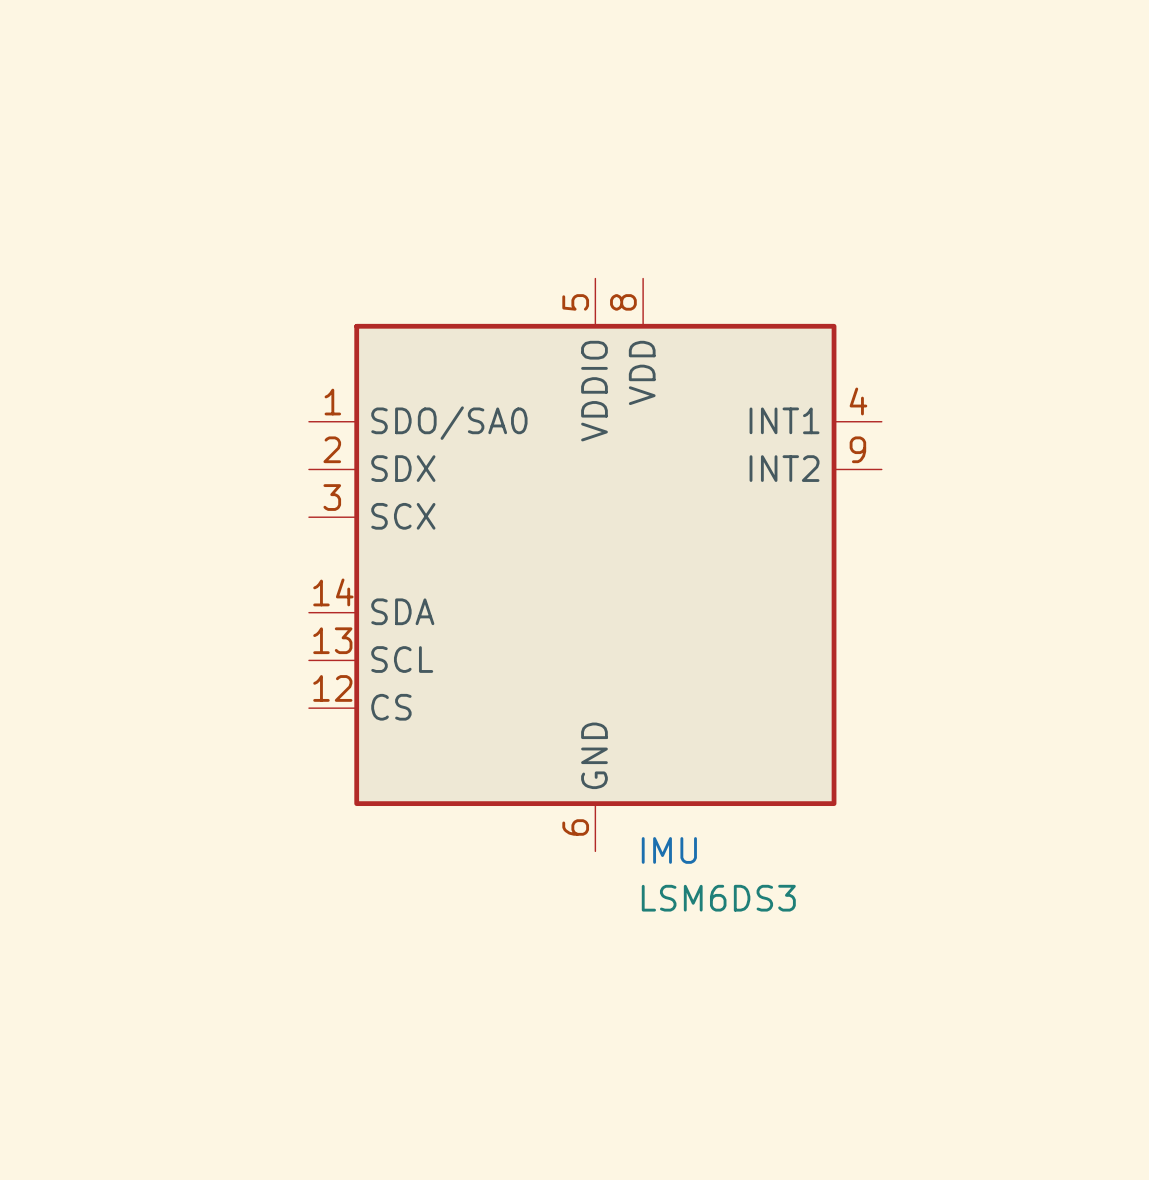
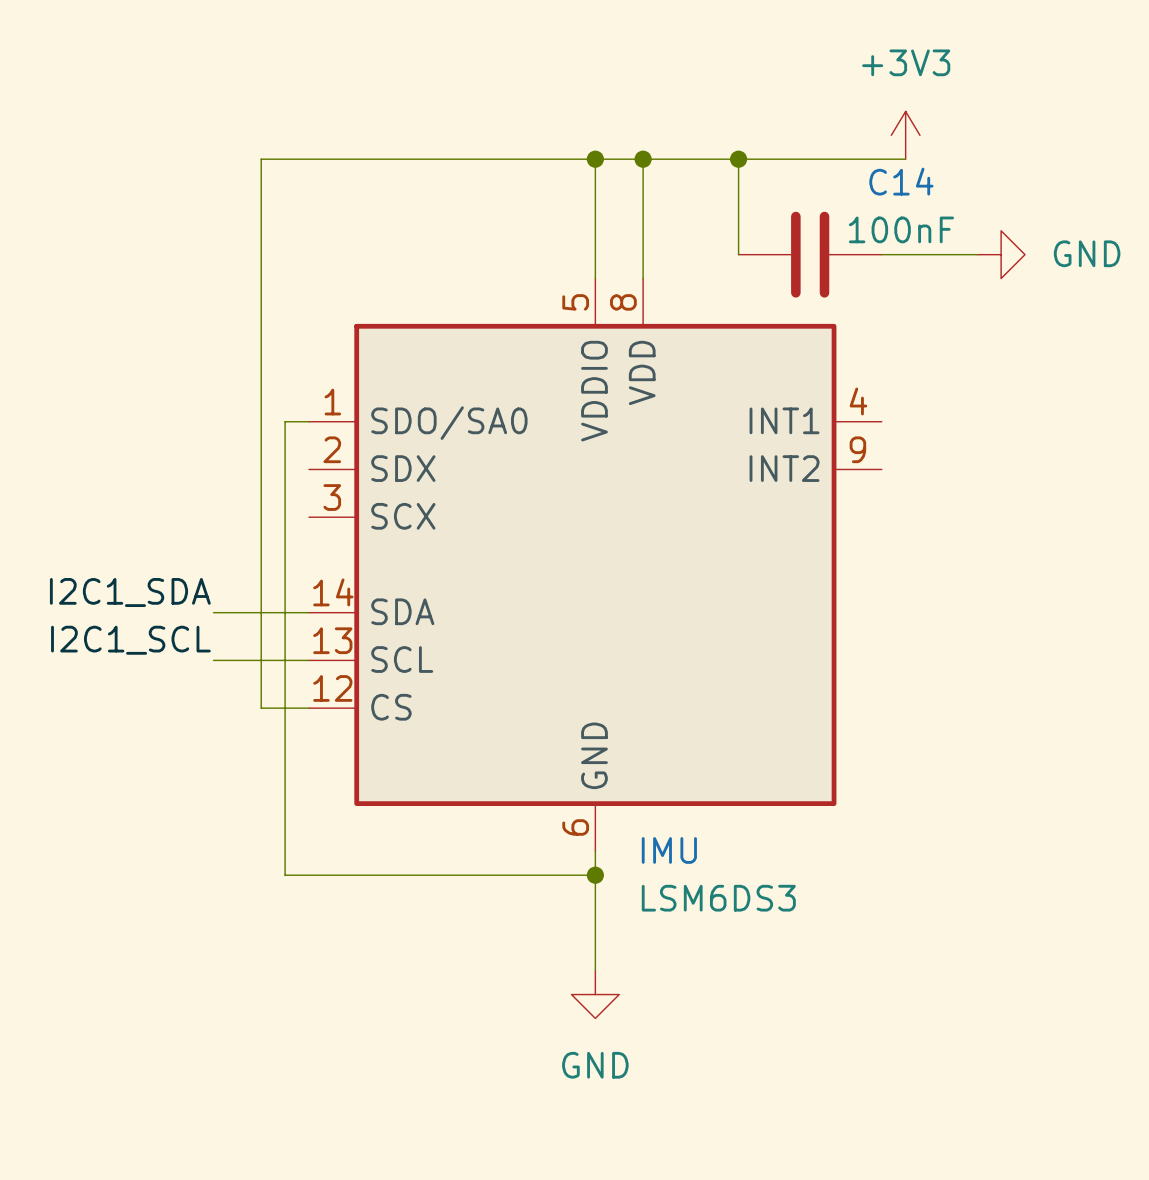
power symbol: none -> +3V3 (905, 135)
wire: none -> (595, 159) (595, 278)
junction: none -> (595, 159)
wire: none -> (643, 159) (643, 278)
junction: none -> (643, 159)
wire: none -> (738, 159) (738, 254)
junction: none -> (738, 159)
wire: none -> (905, 159) (261, 159) (261, 708) (308, 708)
C14: none -> 100nF (810, 254)
wire: none -> (881, 254) (977, 254)
power symbol: none -> GND (1001, 254)
wire: none -> (308, 421) (285, 421) (285, 875) (595, 875)
label: none -> I2C1_SDA (130, 592)
wire: none -> (213, 612) (308, 612)
label: none -> I2C1_SCL (130, 640)
wire: none -> (213, 660) (308, 660)
wire: none -> (595, 851) (595, 970)
junction: none -> (595, 875)
power symbol: none -> GND (595, 994)

